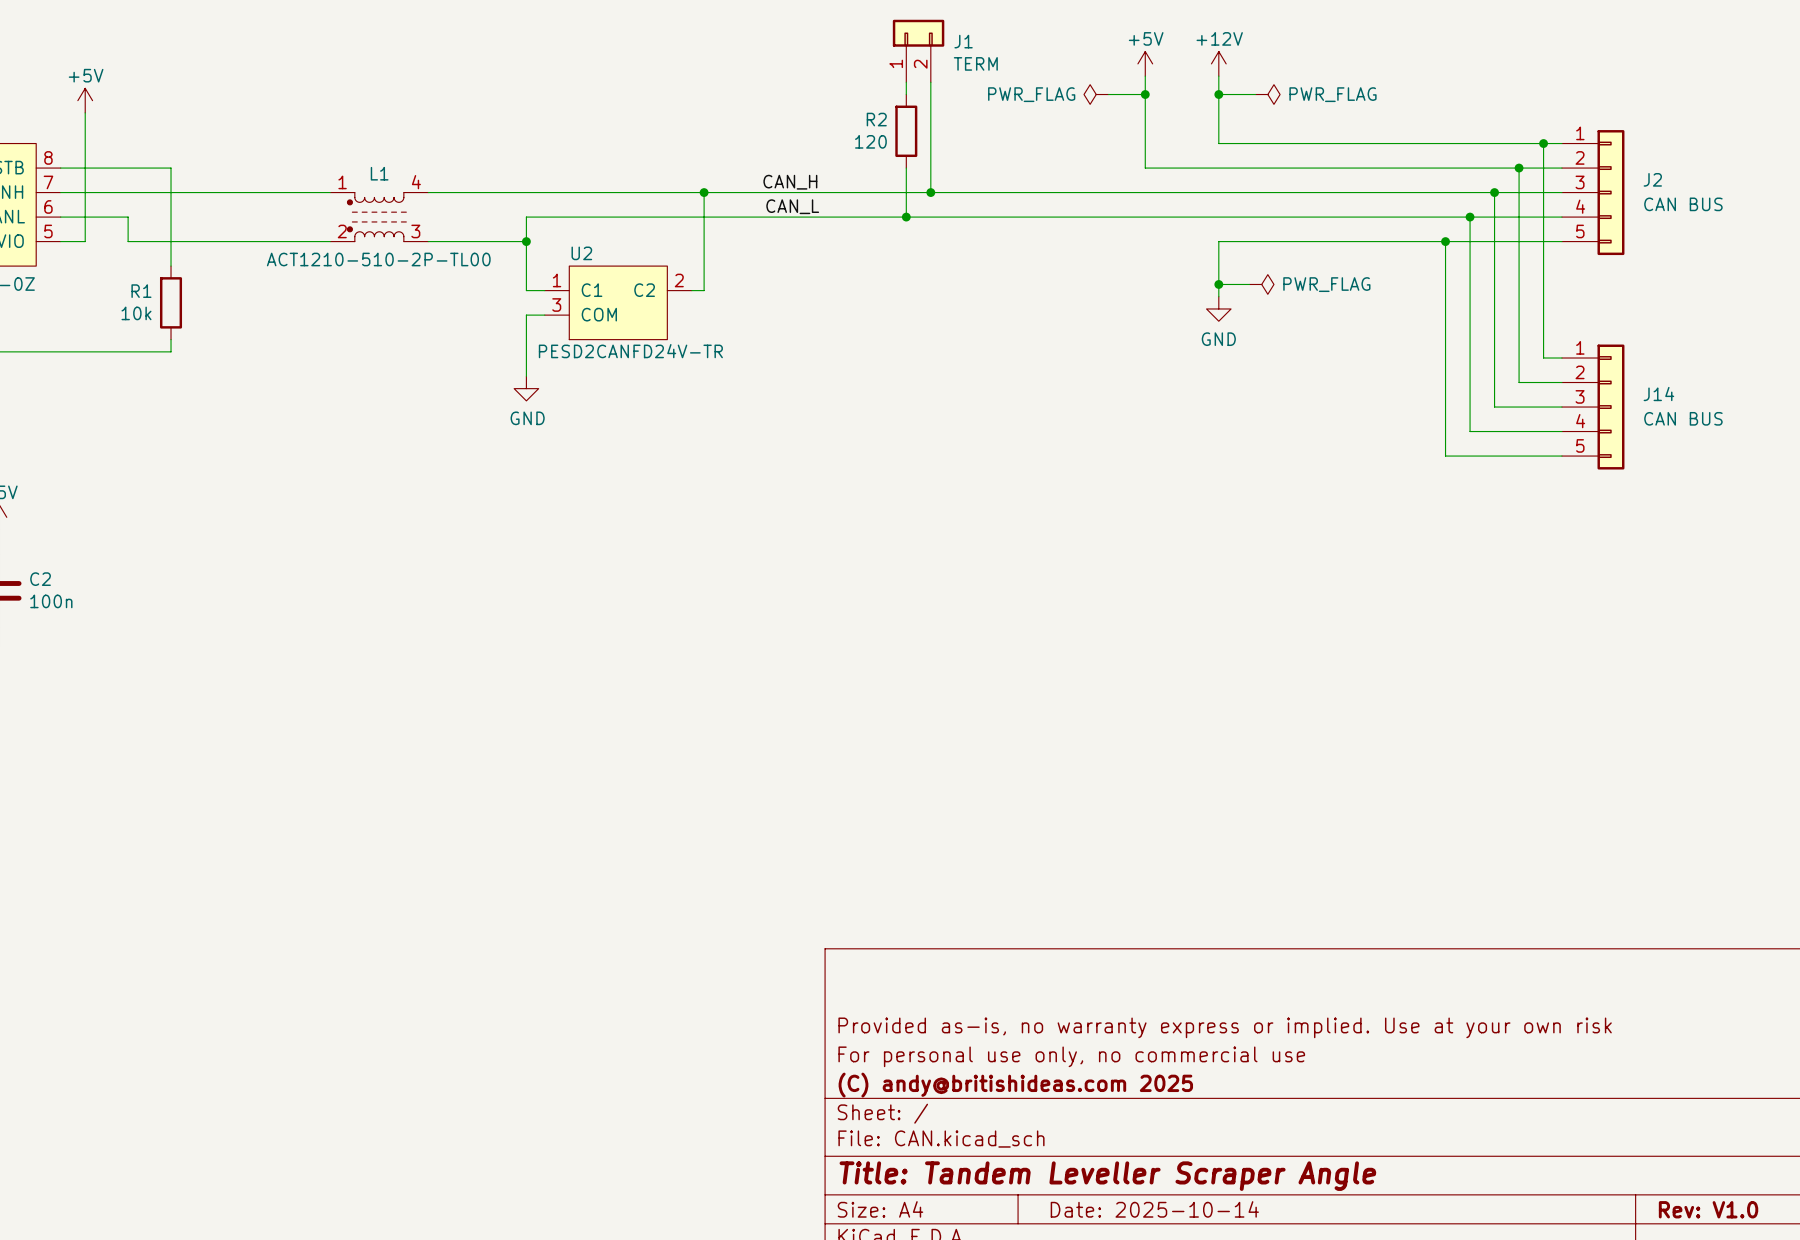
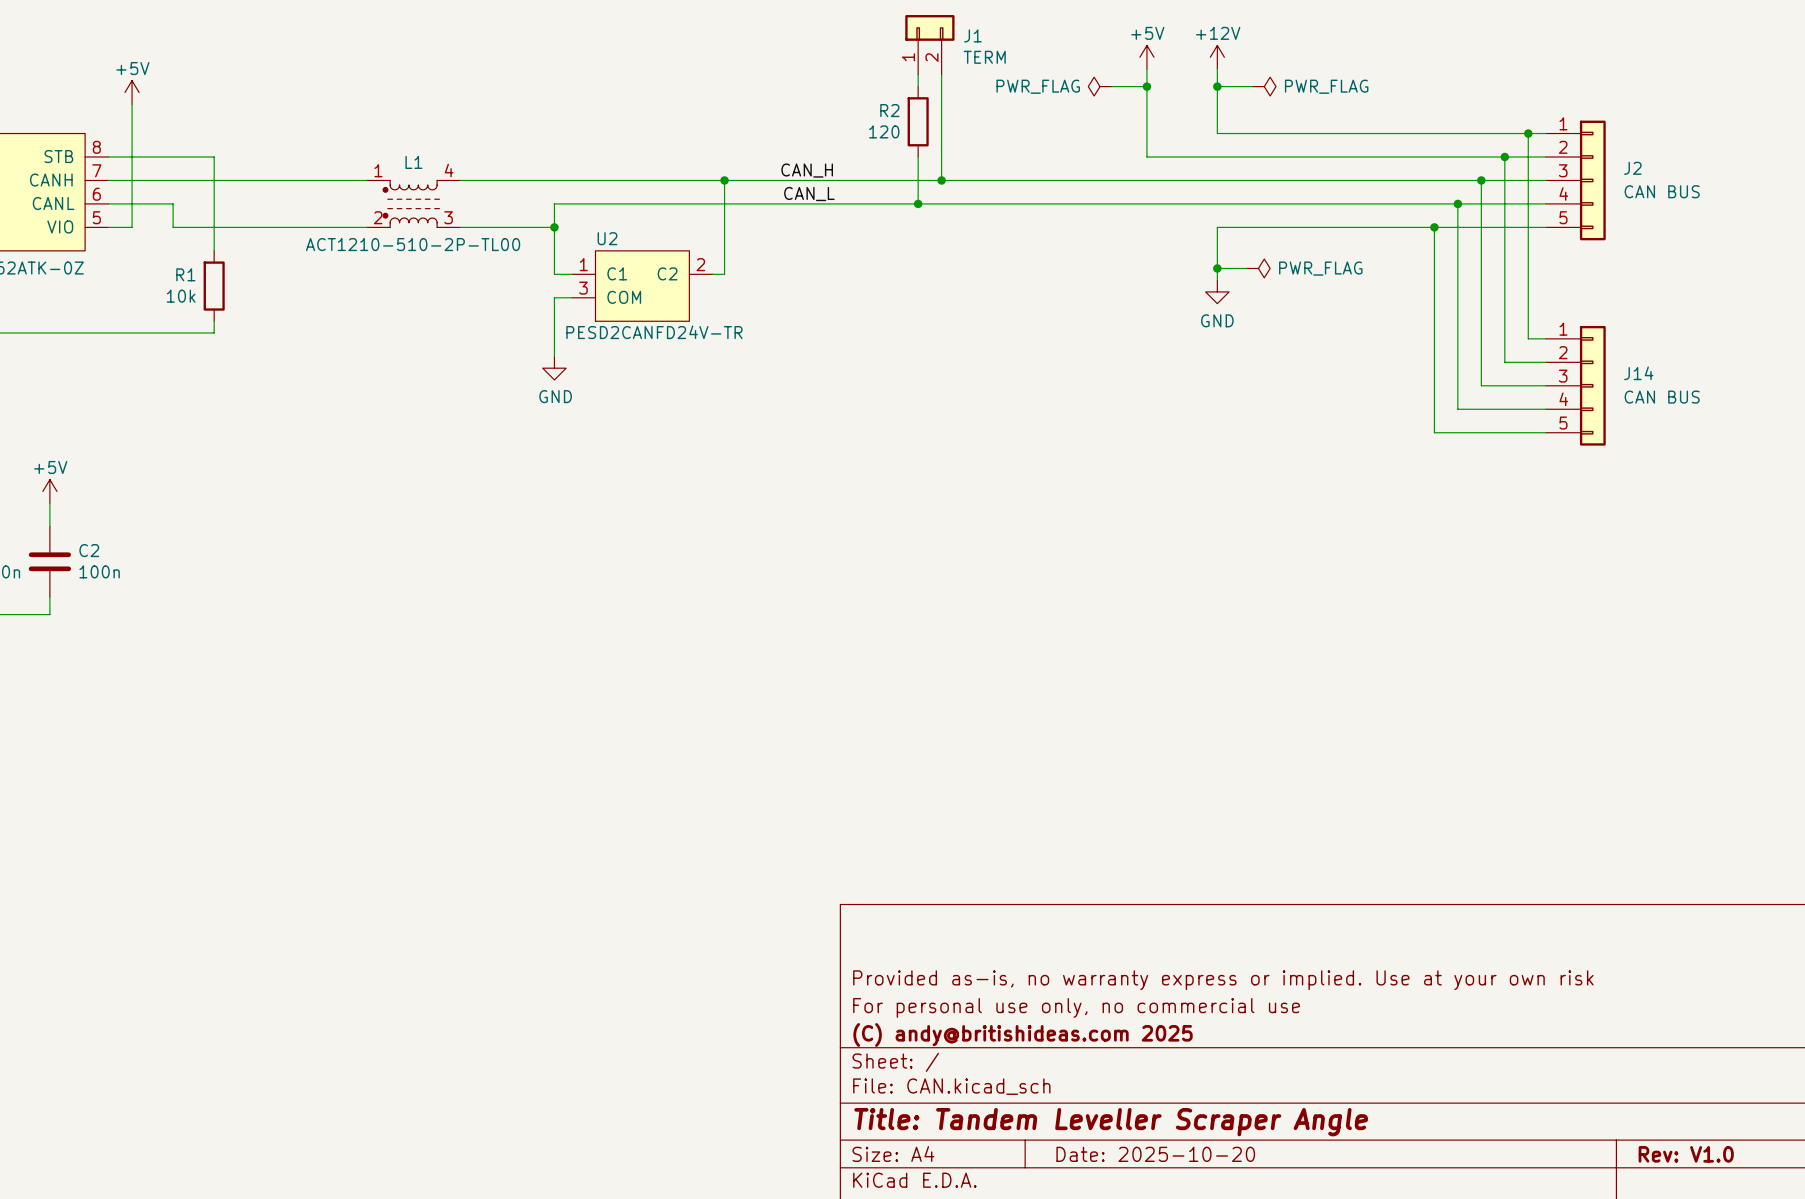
title block: Date: 2025-10-14 (1154, 1209) -> Date: 2025-10-20 (1155, 1154)

